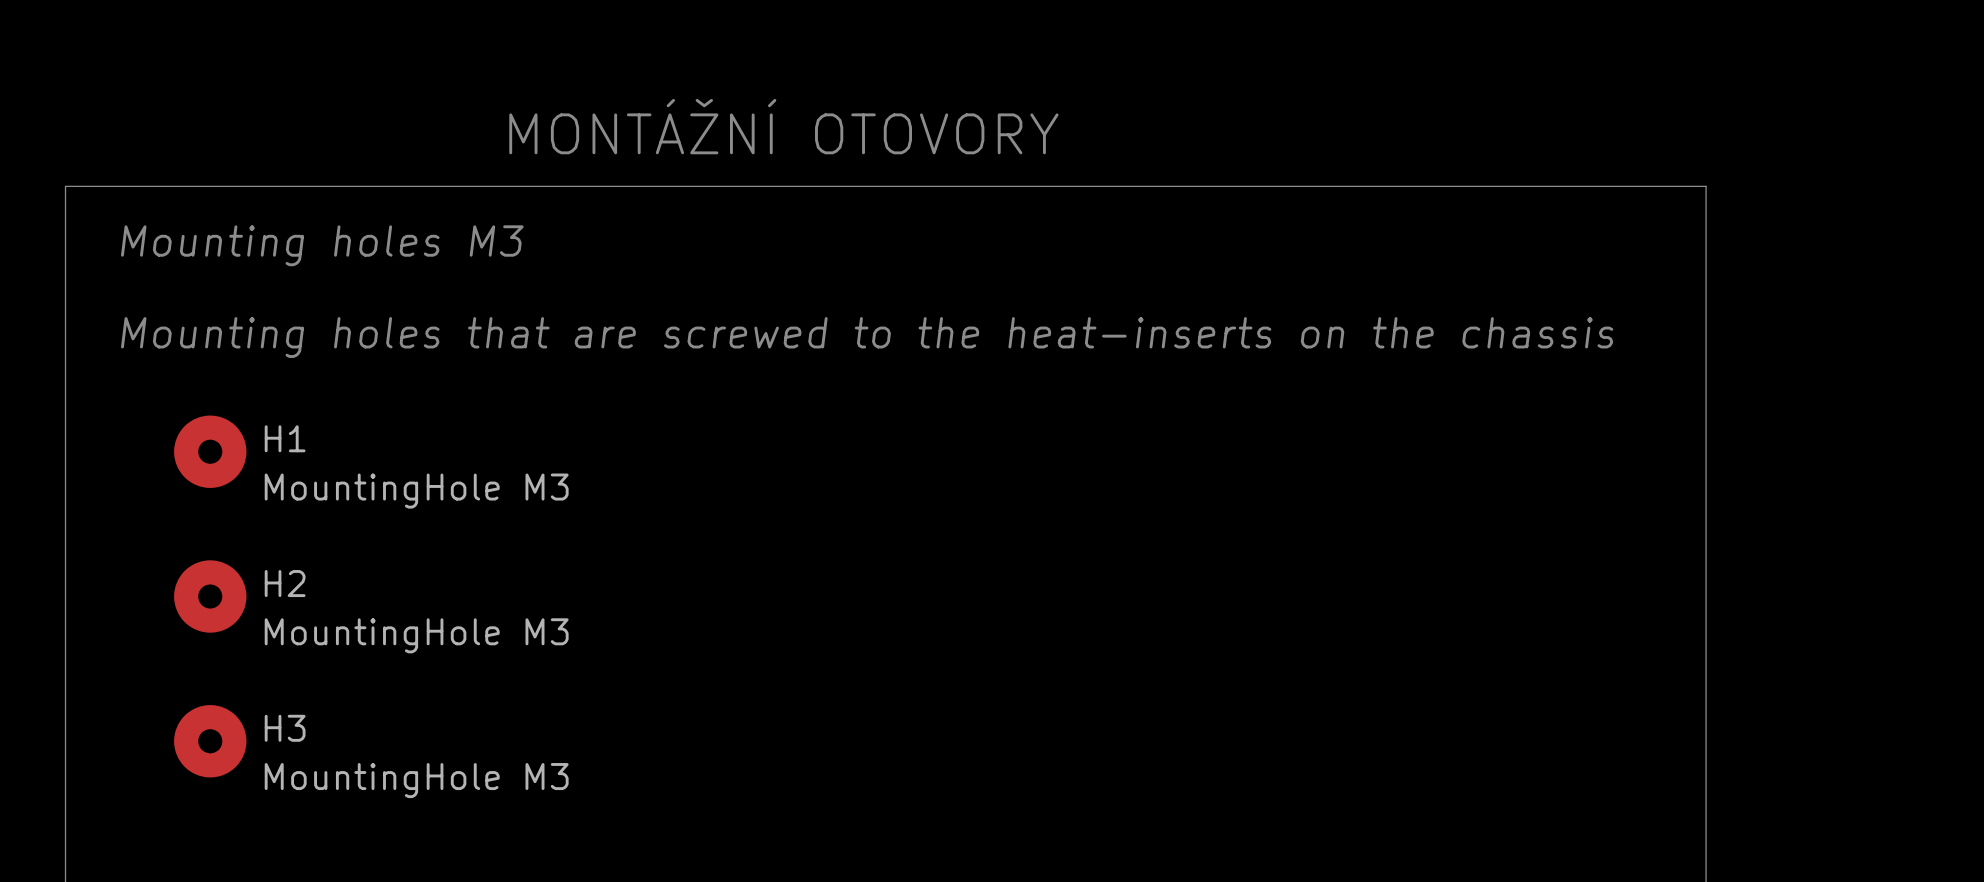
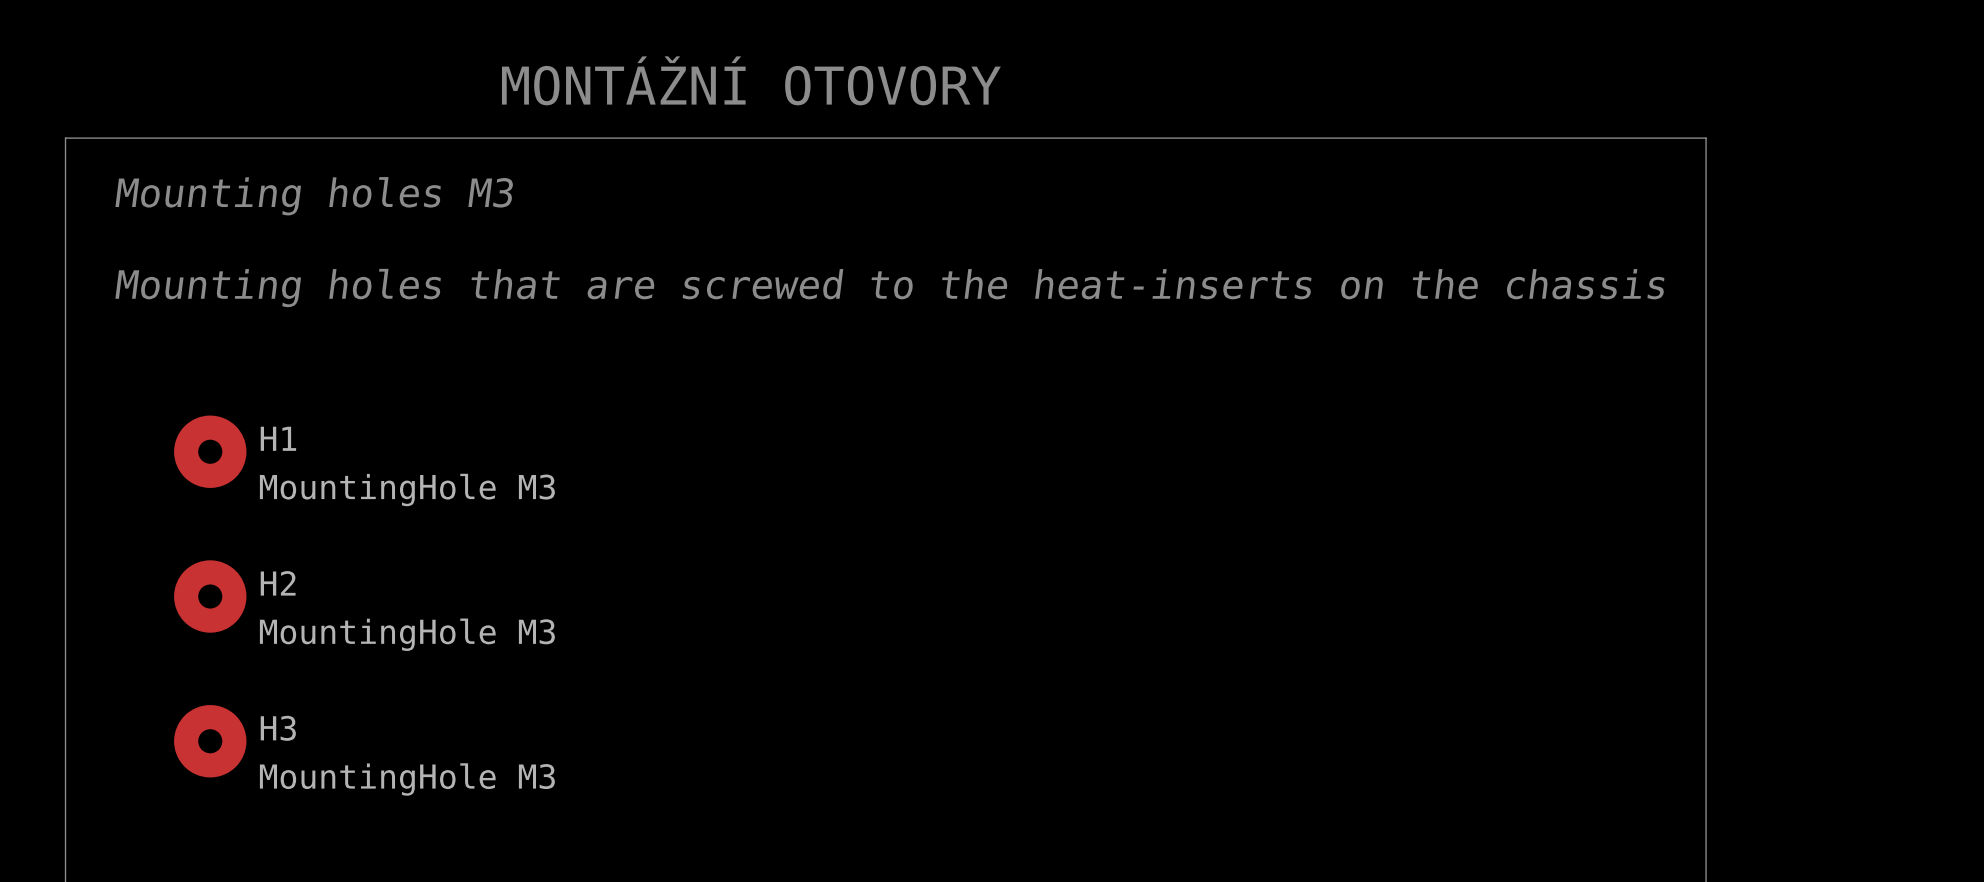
text position: MONTÁŽNÍ OTOVORY (783, 126) -> MONTÁŽNÍ OTOVORY (751, 80)
line: (65, 186) (1706, 186) -> (65, 186) (65, 138) (1706, 138) (1706, 186)
text position: Mounting holes M3 (322, 245) -> Mounting holes M3 (314, 196)
text position: Mounting holes that are screwed to the heat-inserts on the chassis (867, 337) -> Mounting holes that are screwed to the heat-inserts on the chassis (889, 288)

